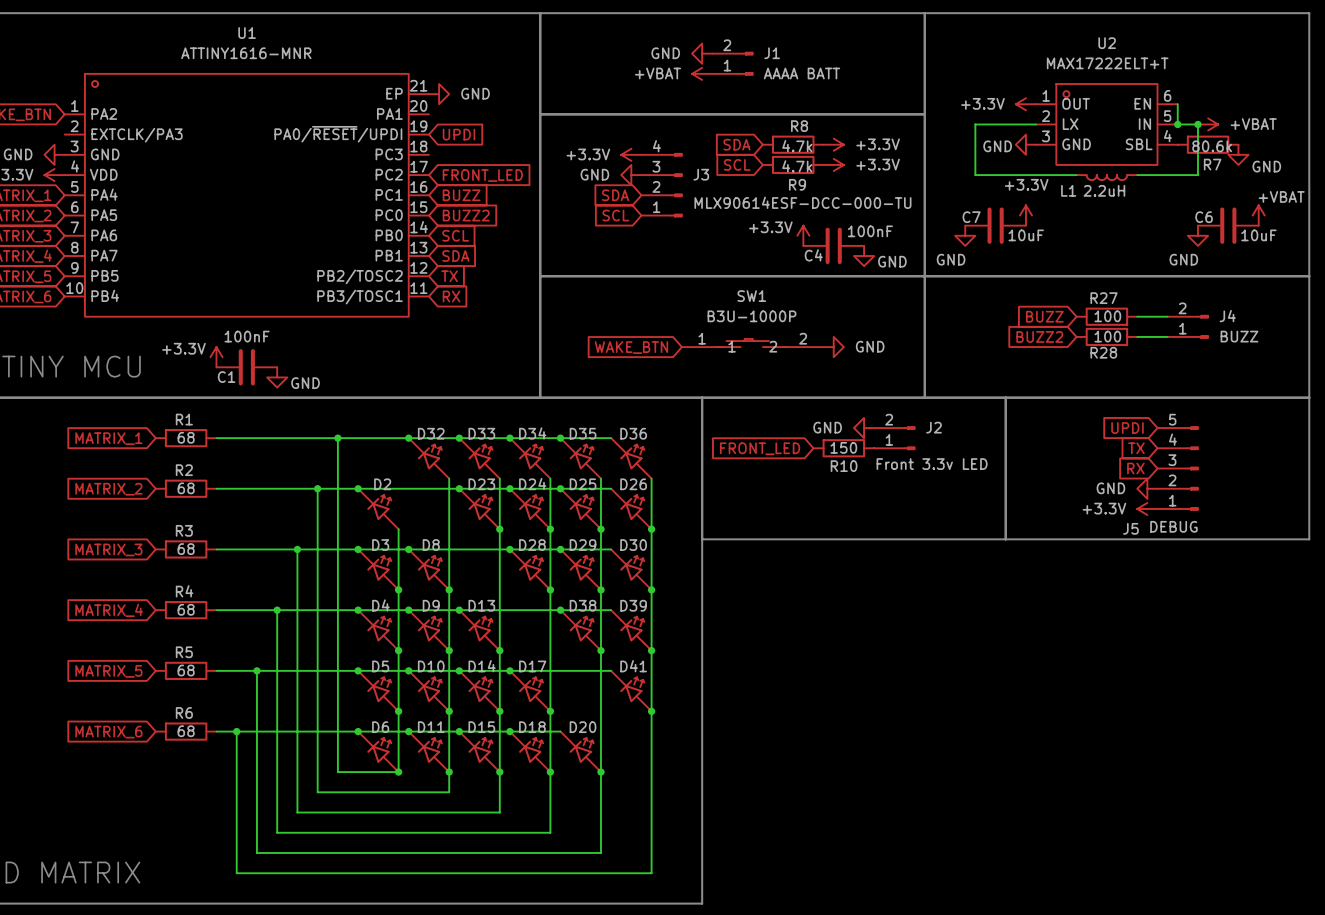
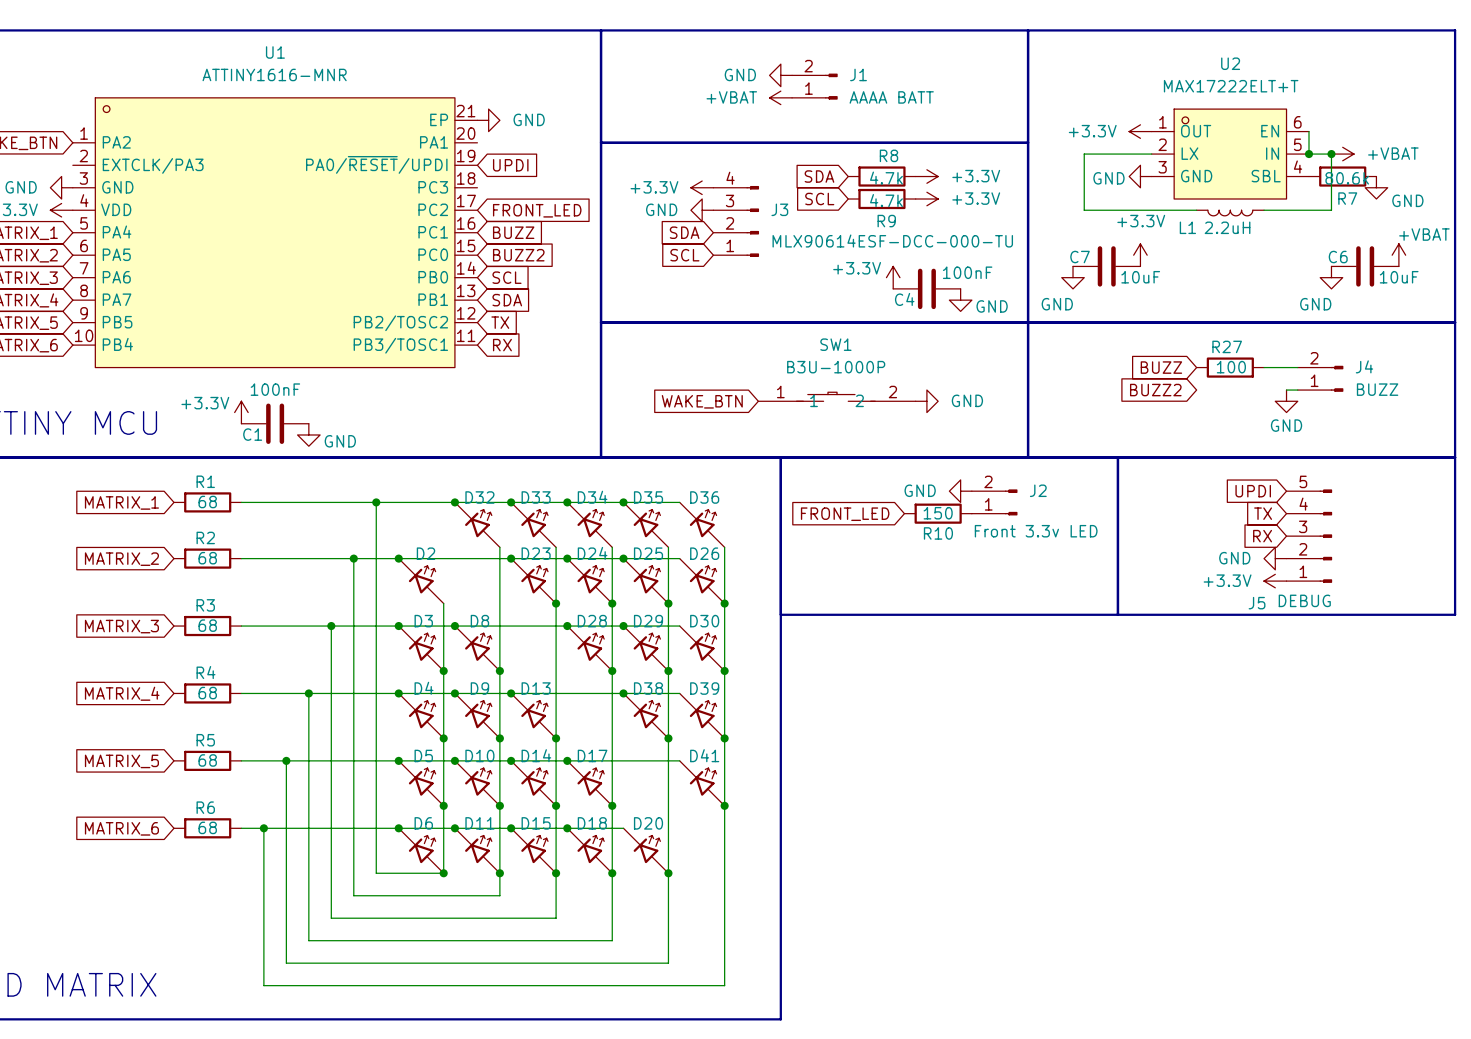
R28: 100 (1106, 336) -> none
wire: (1137, 336) (1157, 336) -> none
power symbol: none -> GND (1286, 401)

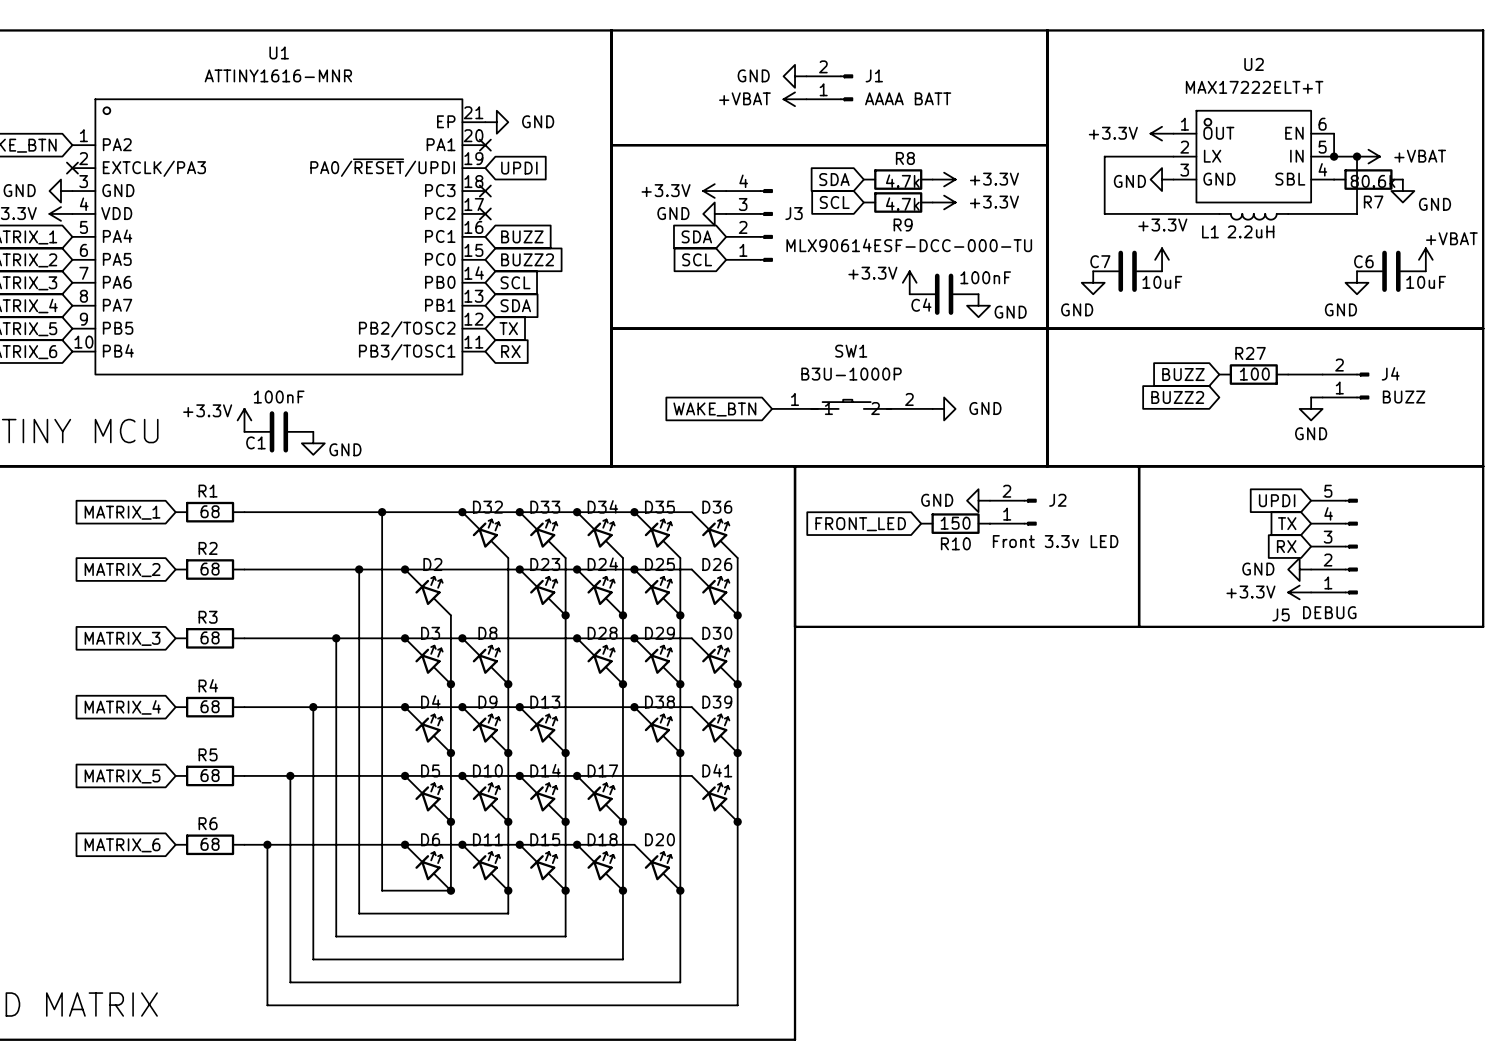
no-connect mark: none -> (485, 145)
no-connect mark: none -> (72, 168)
no-connect mark: none -> (485, 191)
no-connect mark: none -> (485, 213)
global label: FRONT_LED (537, 210) -> none

